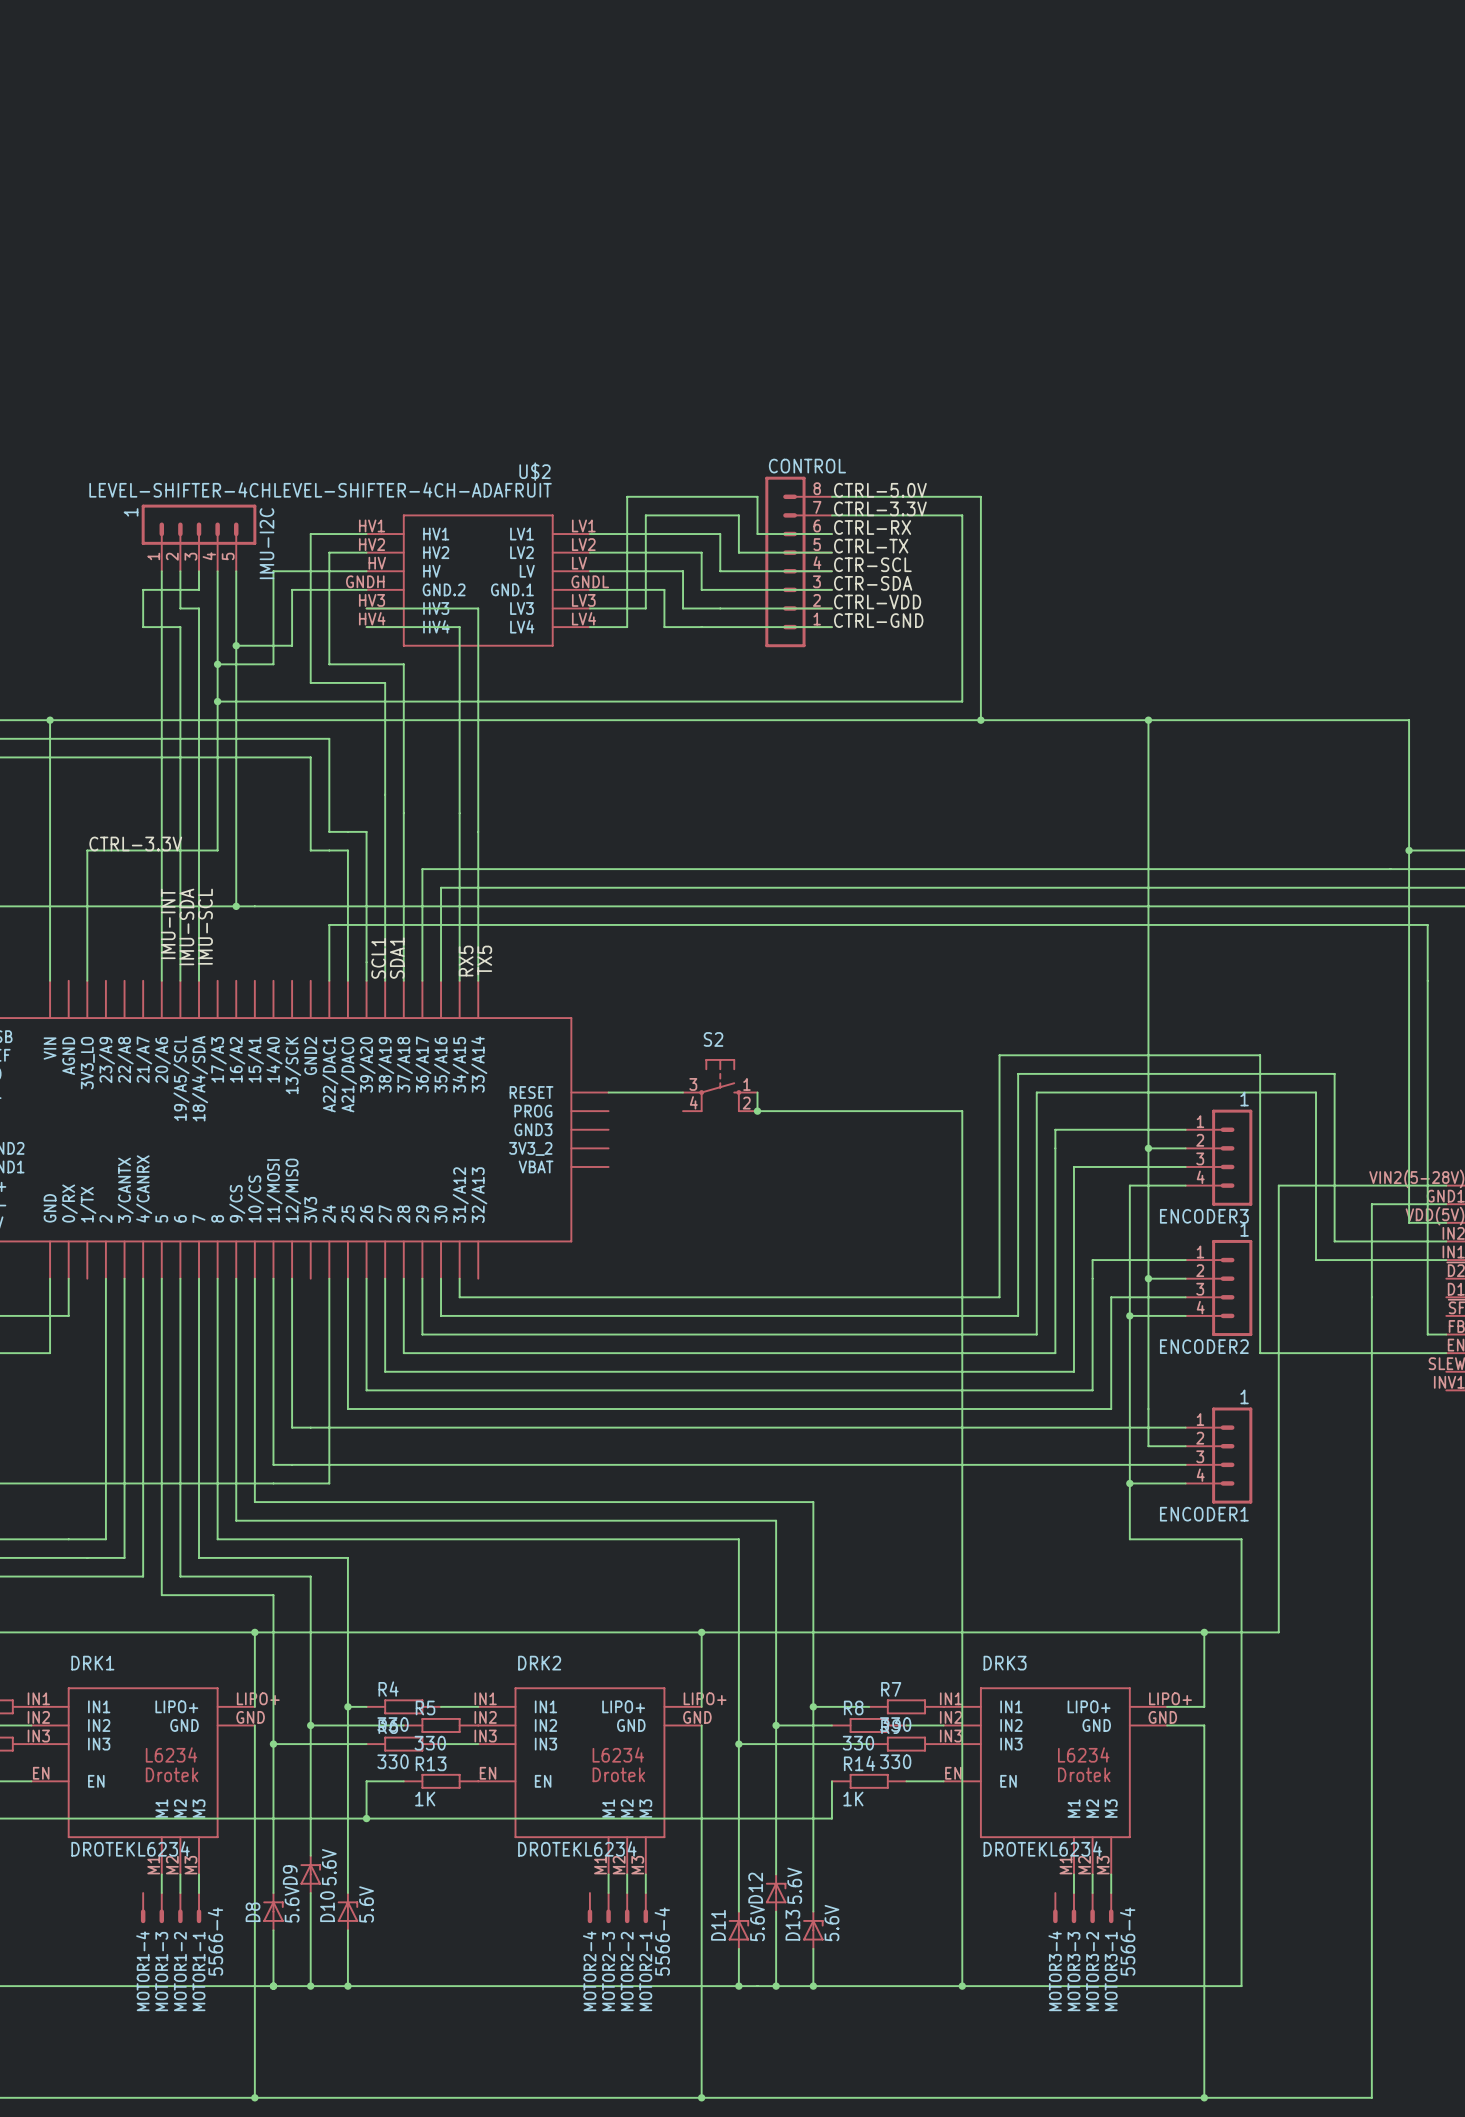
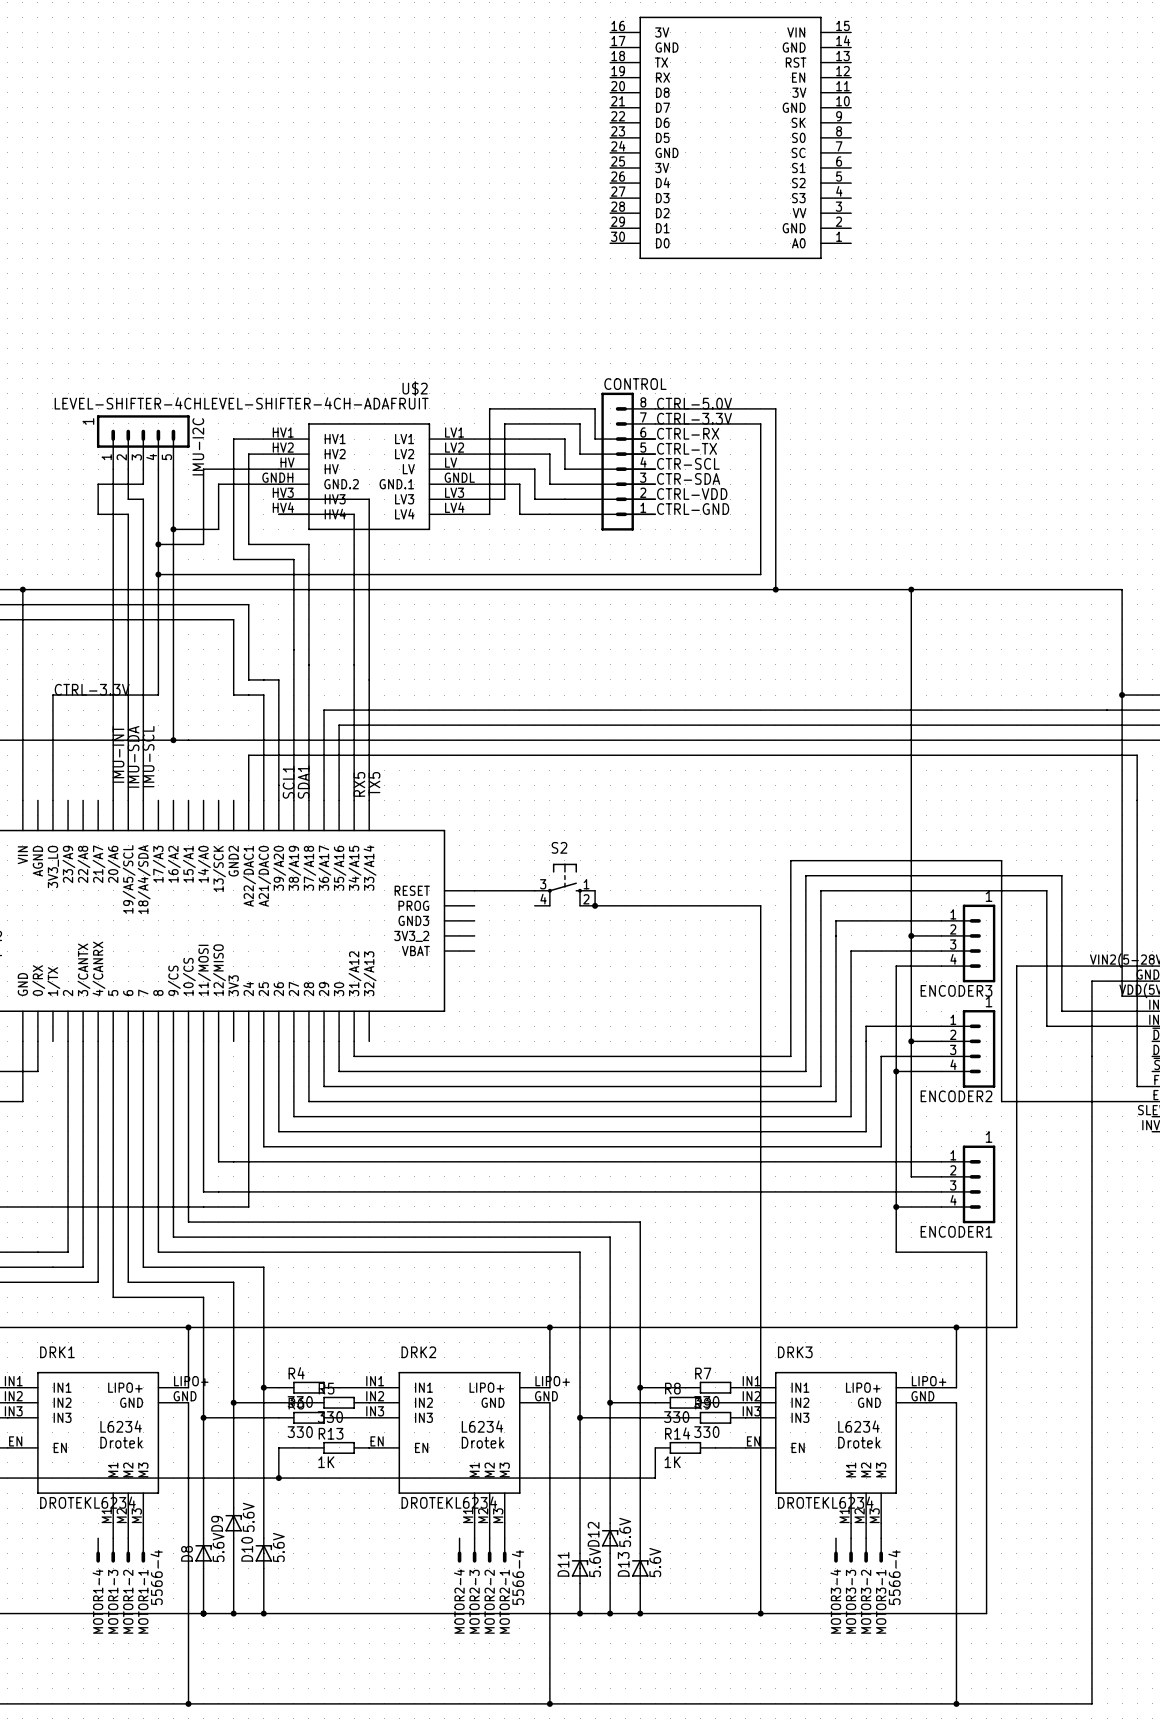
part: none -> (730, 137)

